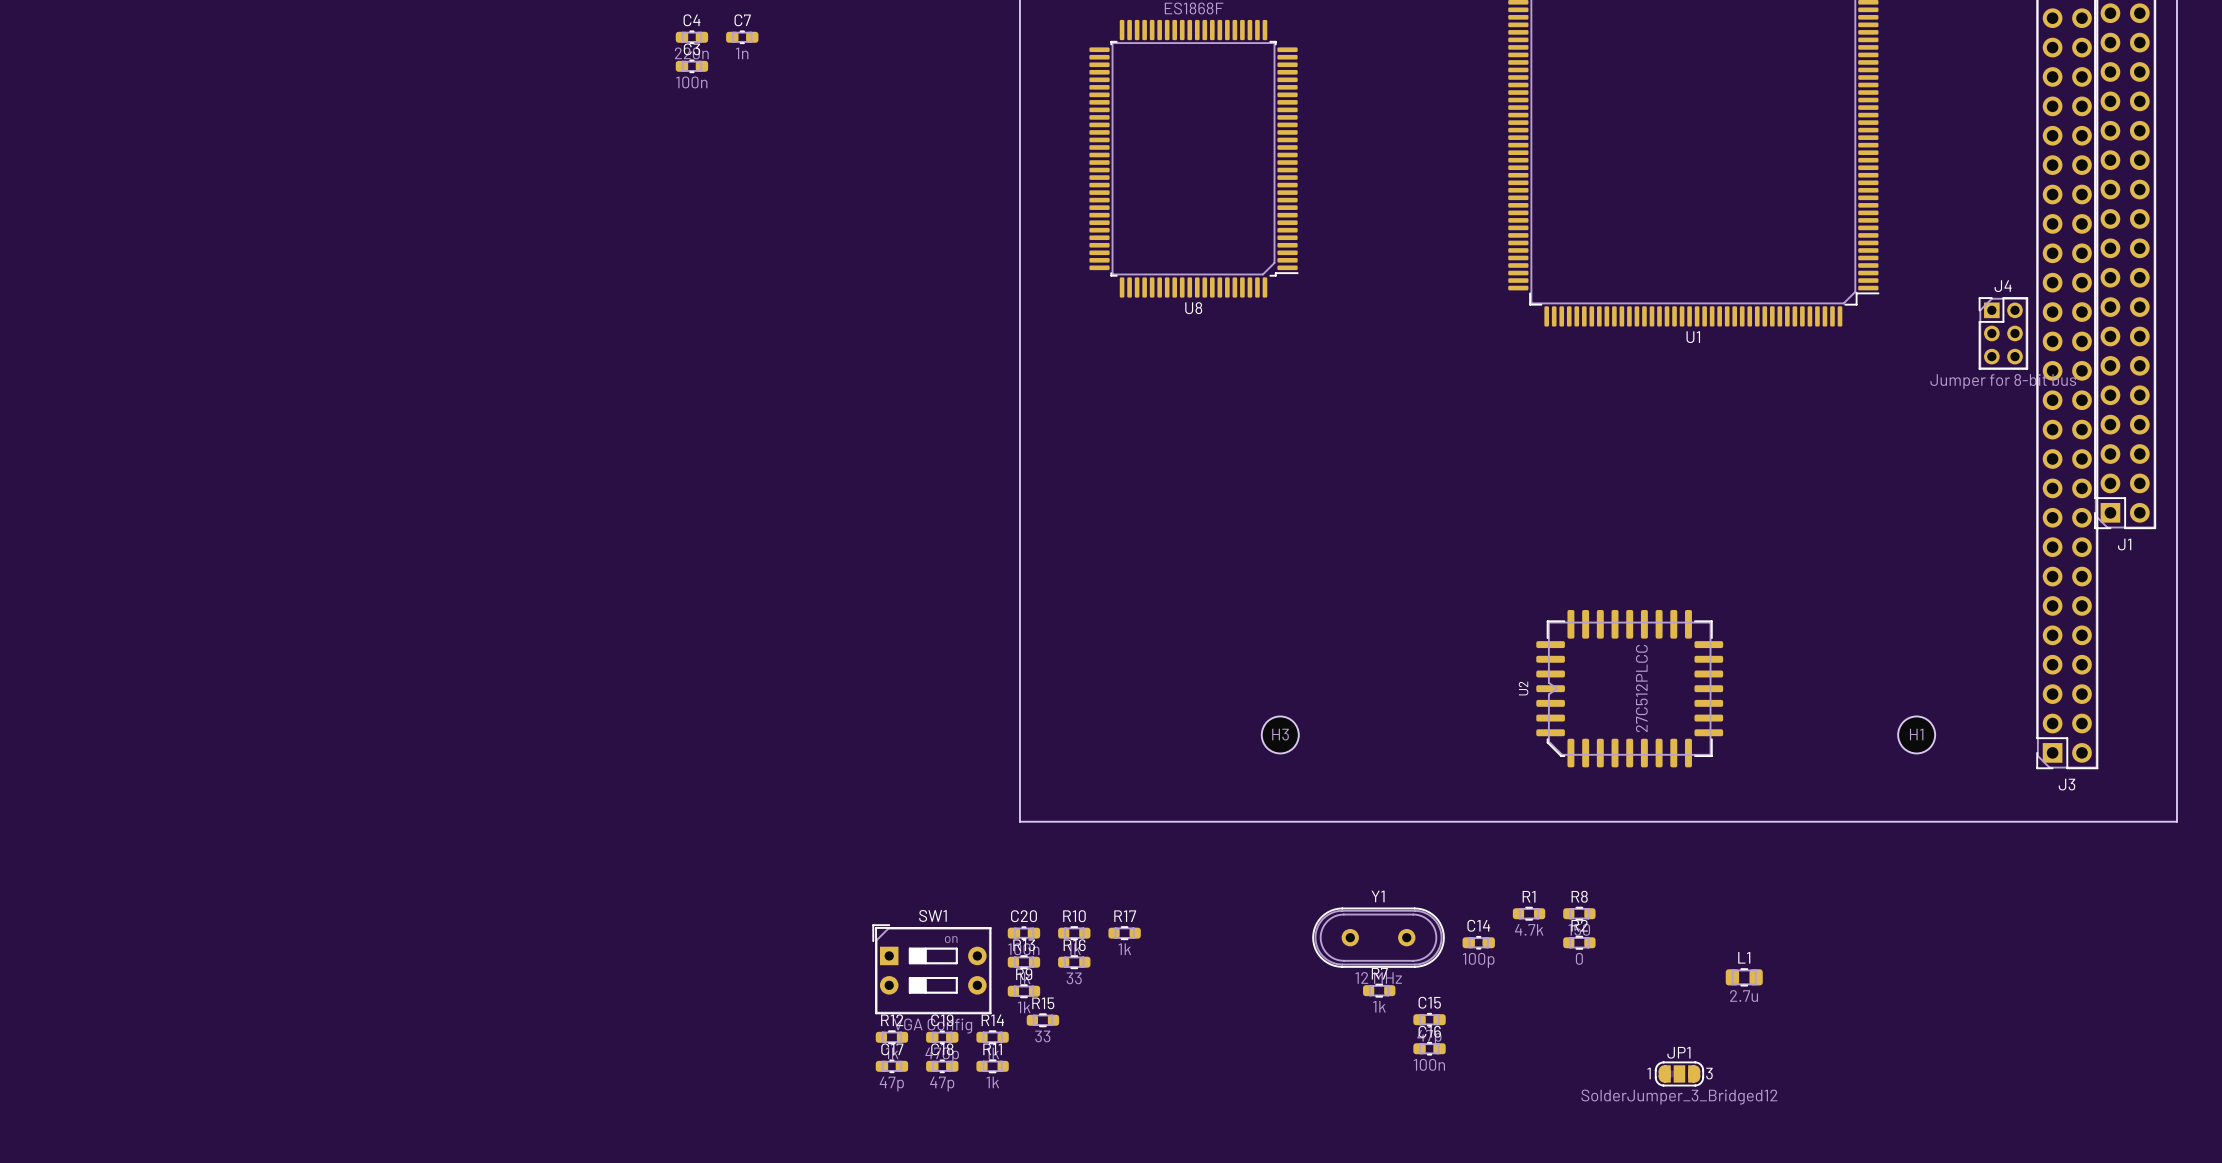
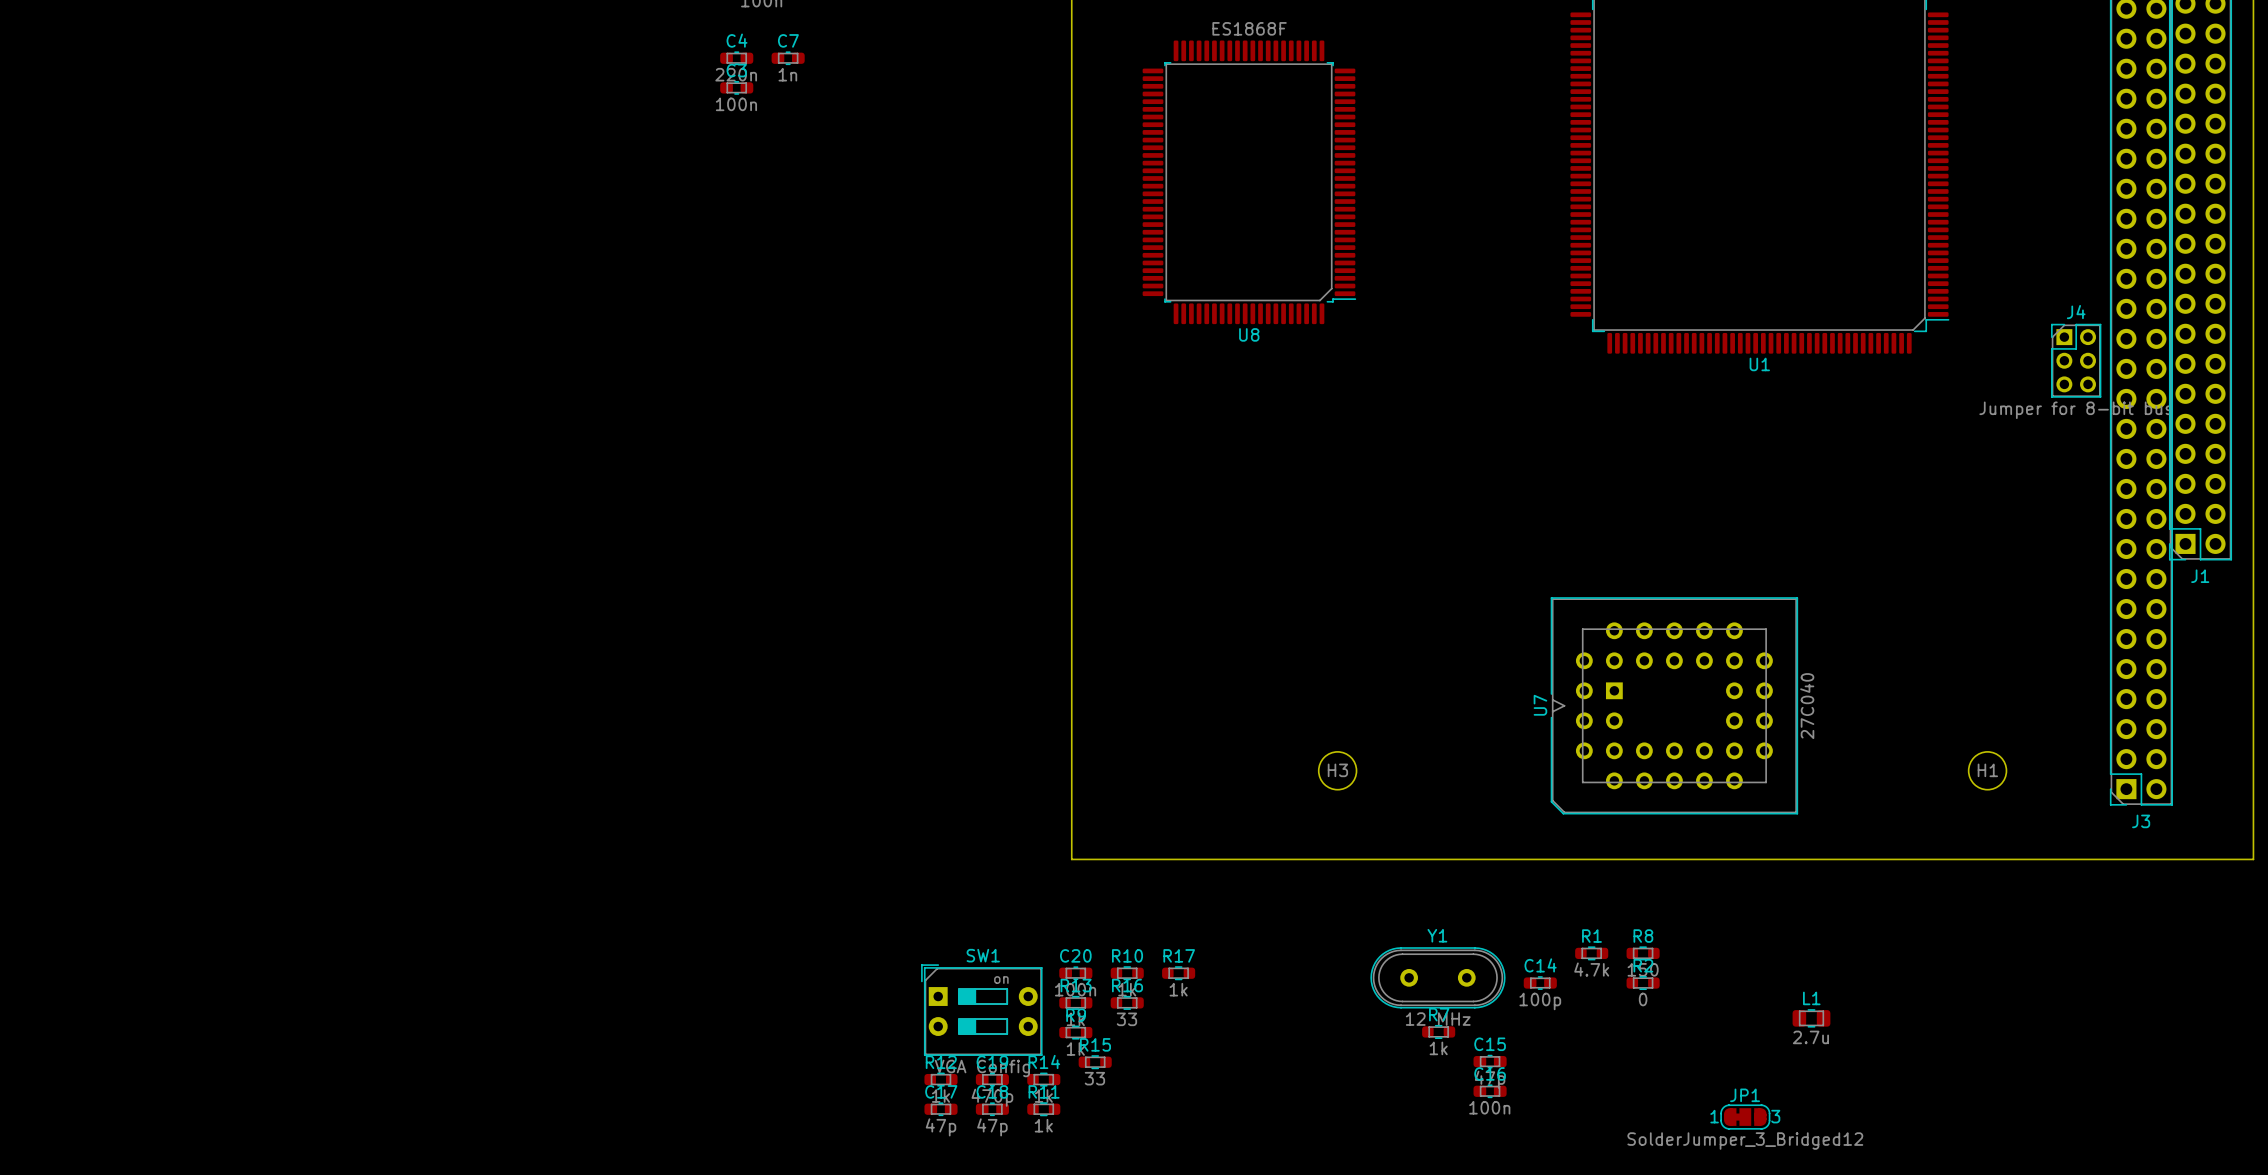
U7: none -> 27C040 (1674, 705)
U2: 27C512PLCC (1629, 688) -> none

